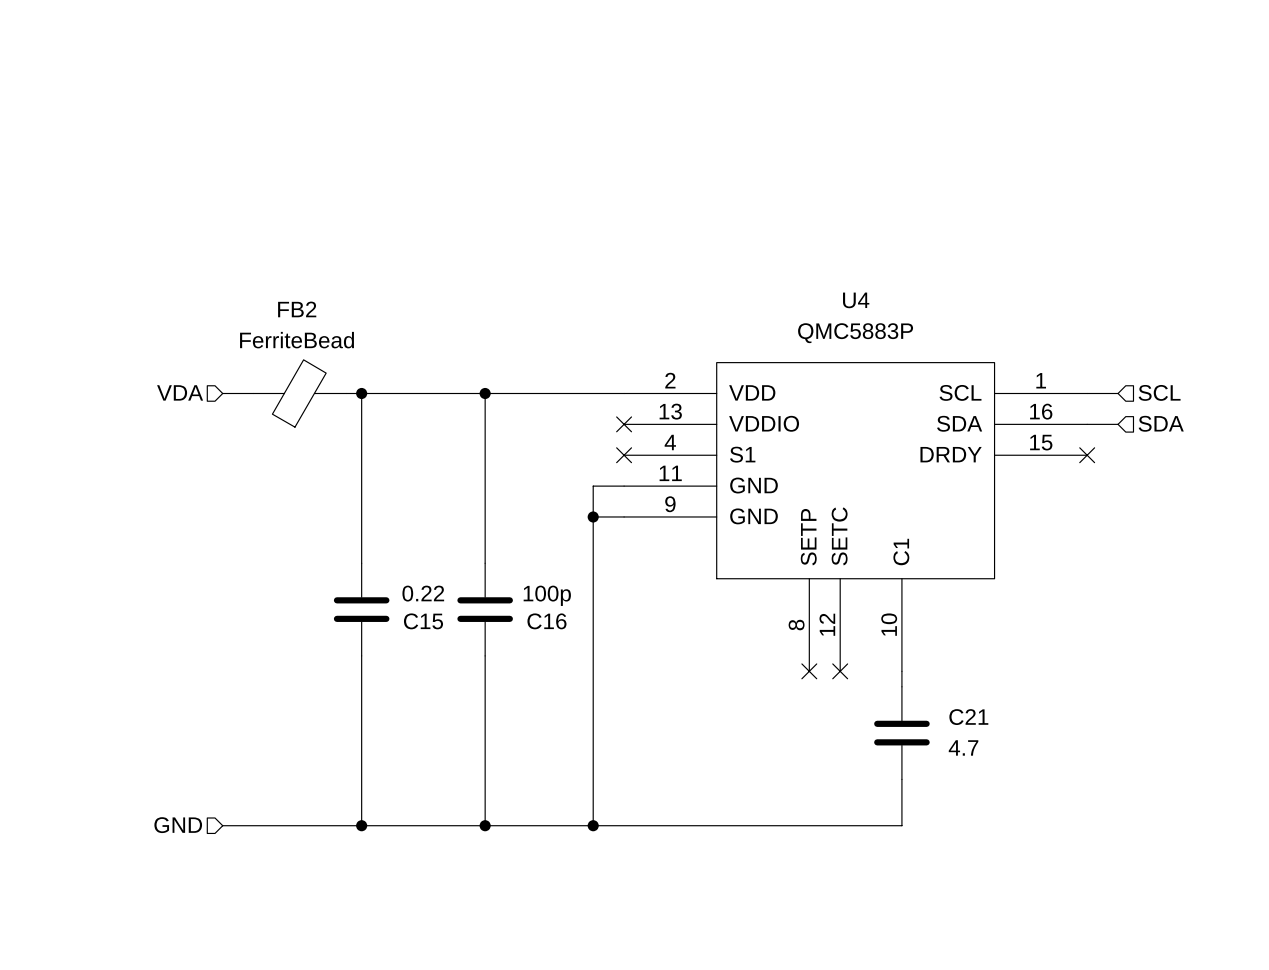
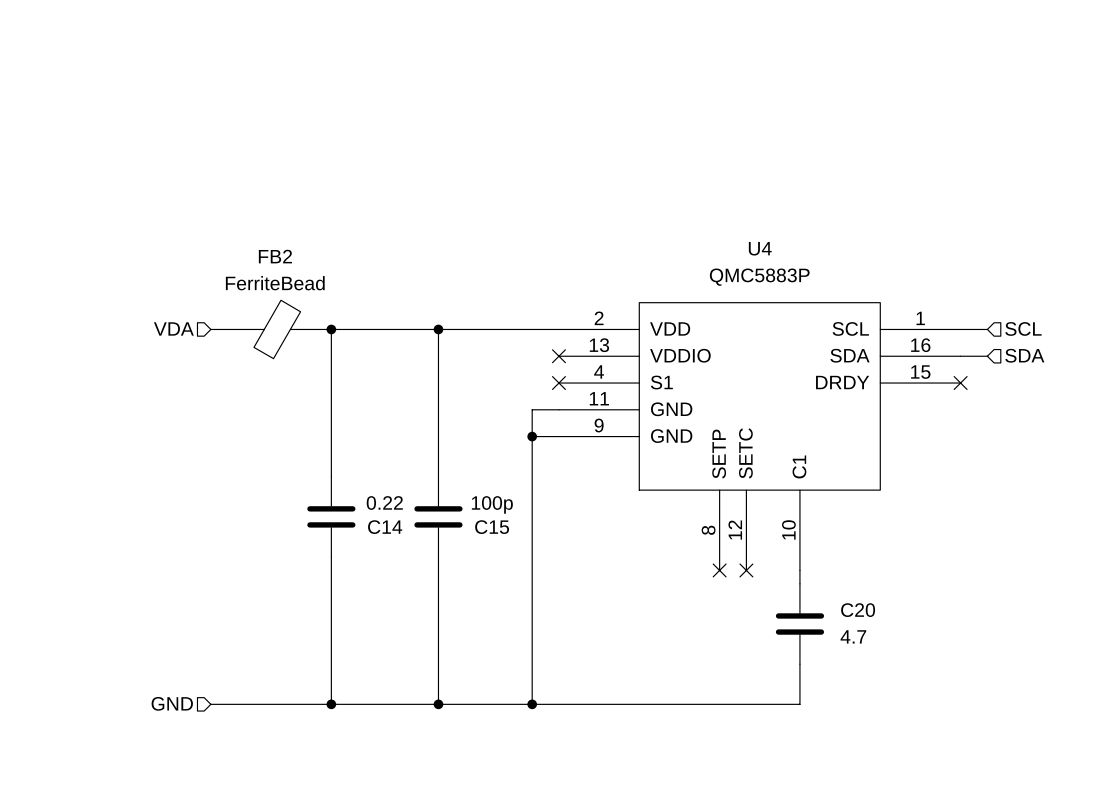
C15 name: C15 (423, 621) -> C14 (385, 527)
C16 name: C16 (546, 621) -> C15 (492, 527)
C21 name: C21 (968, 717) -> C20 (858, 610)

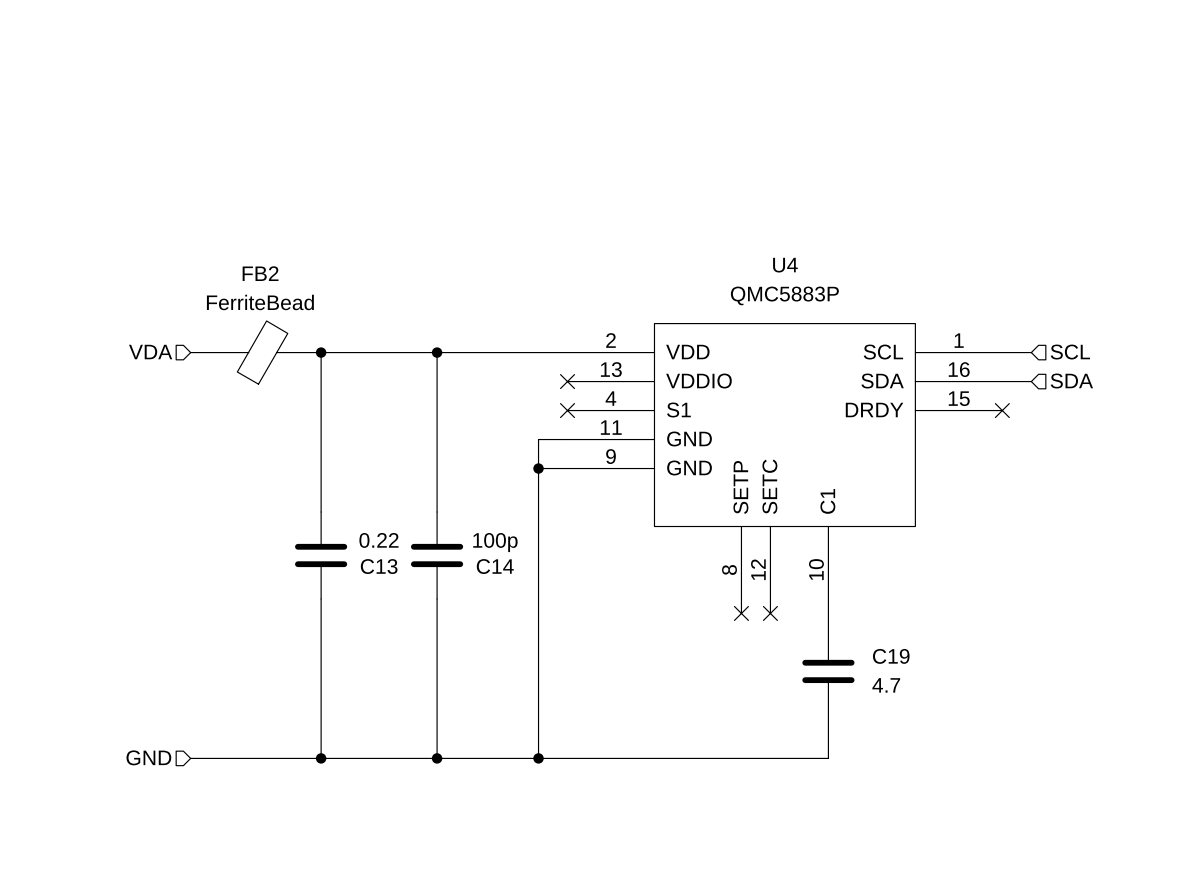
C14 name: C14 (385, 527) -> C13 (379, 566)
C15 name: C15 (492, 527) -> C14 (495, 566)
C20 name: C20 (858, 610) -> C19 (891, 656)

